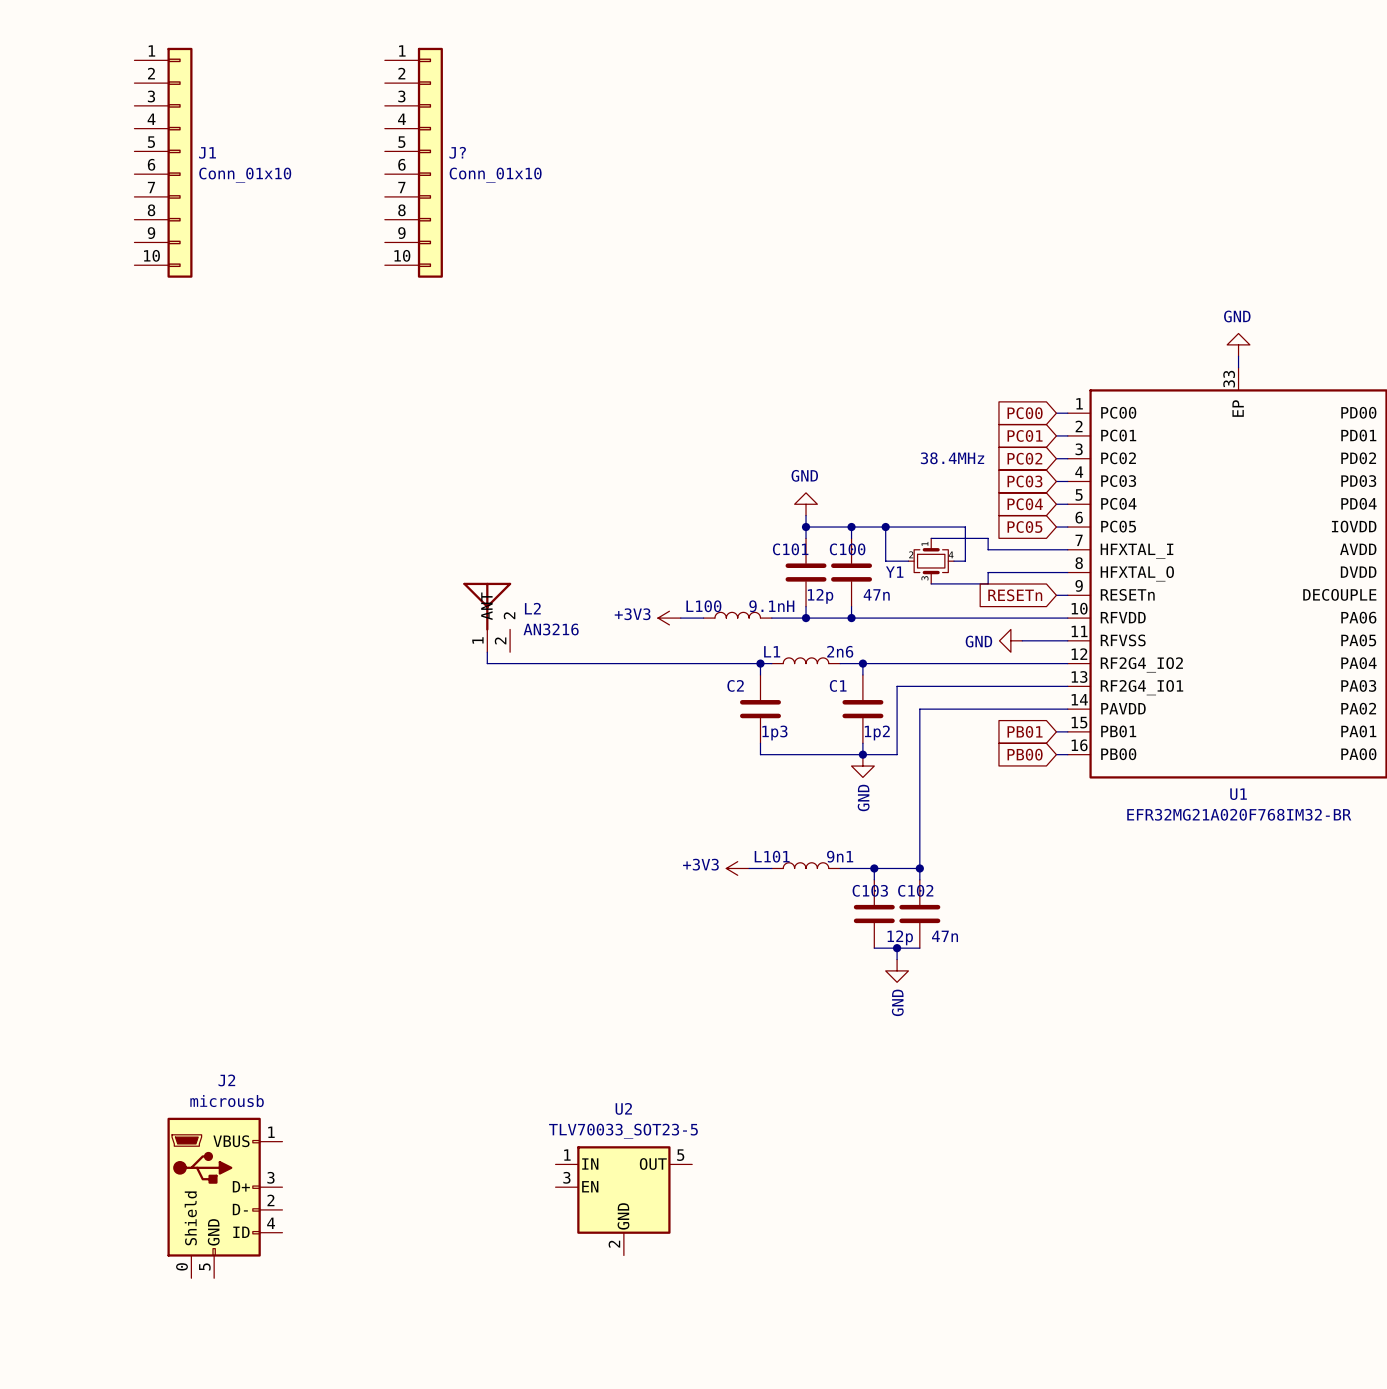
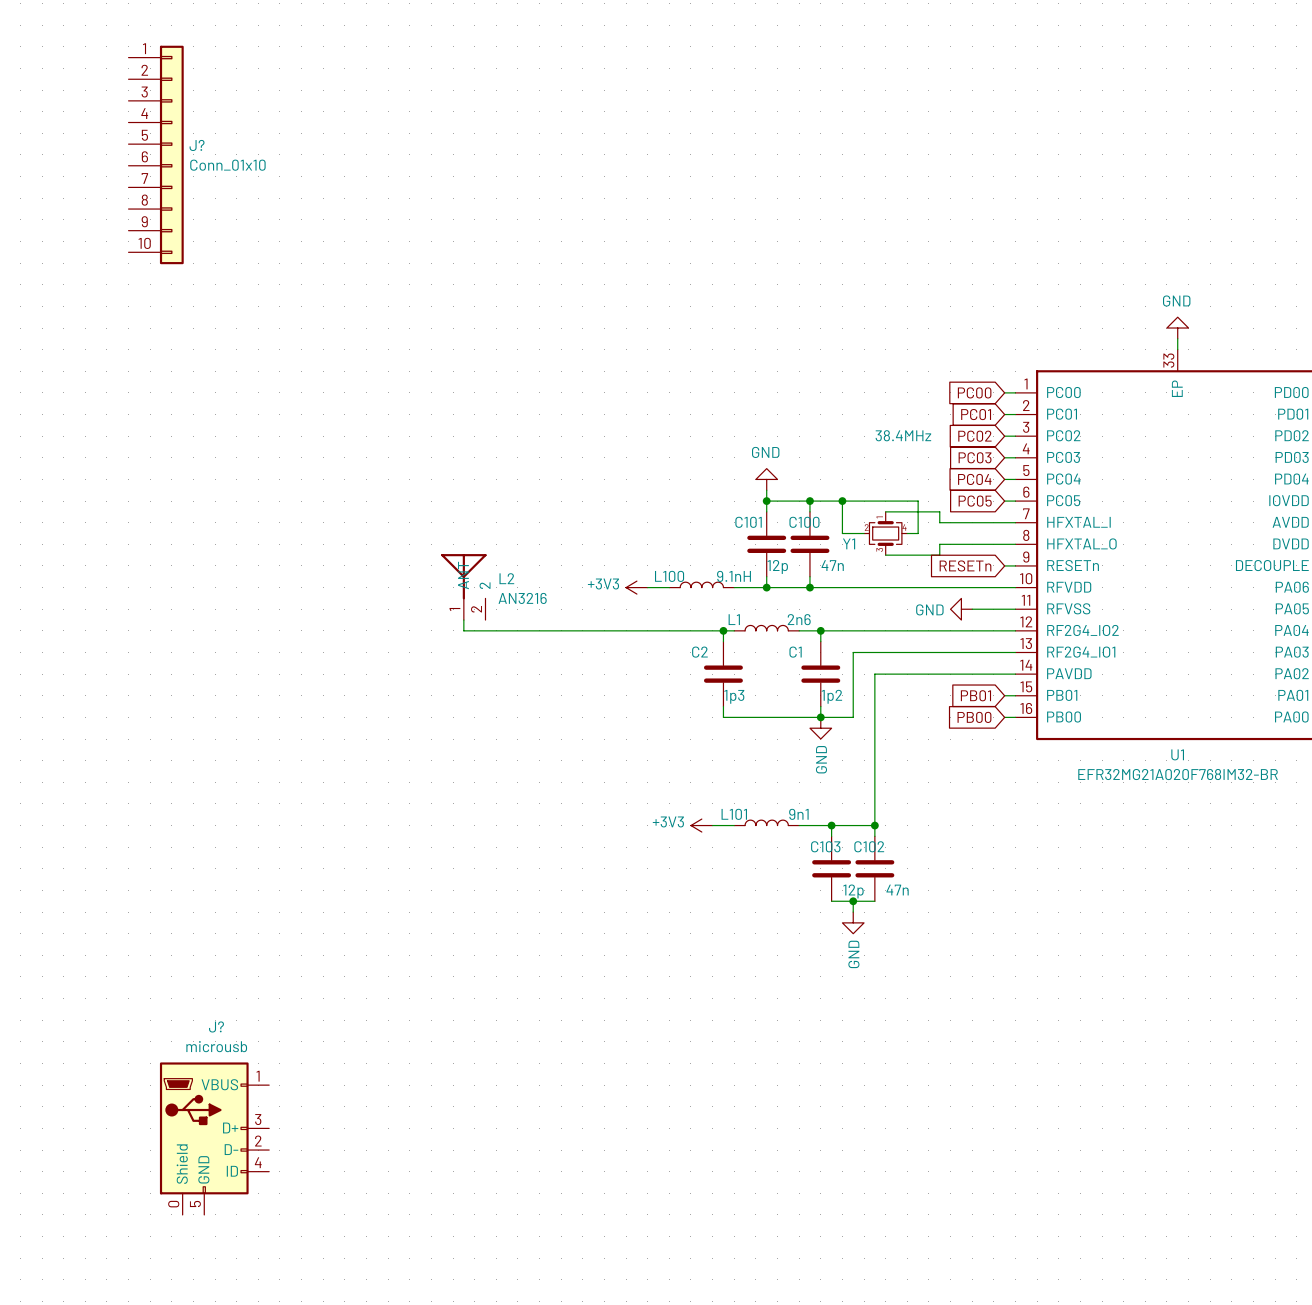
J1 name: J1 (207, 152) -> J? (197, 145)
J?: Conn_01x10 (413, 162) -> none
J2 name: J2 (226, 1080) -> J? (216, 1026)
U2: TLV70033_SOT23-5 (623, 1200) -> none

